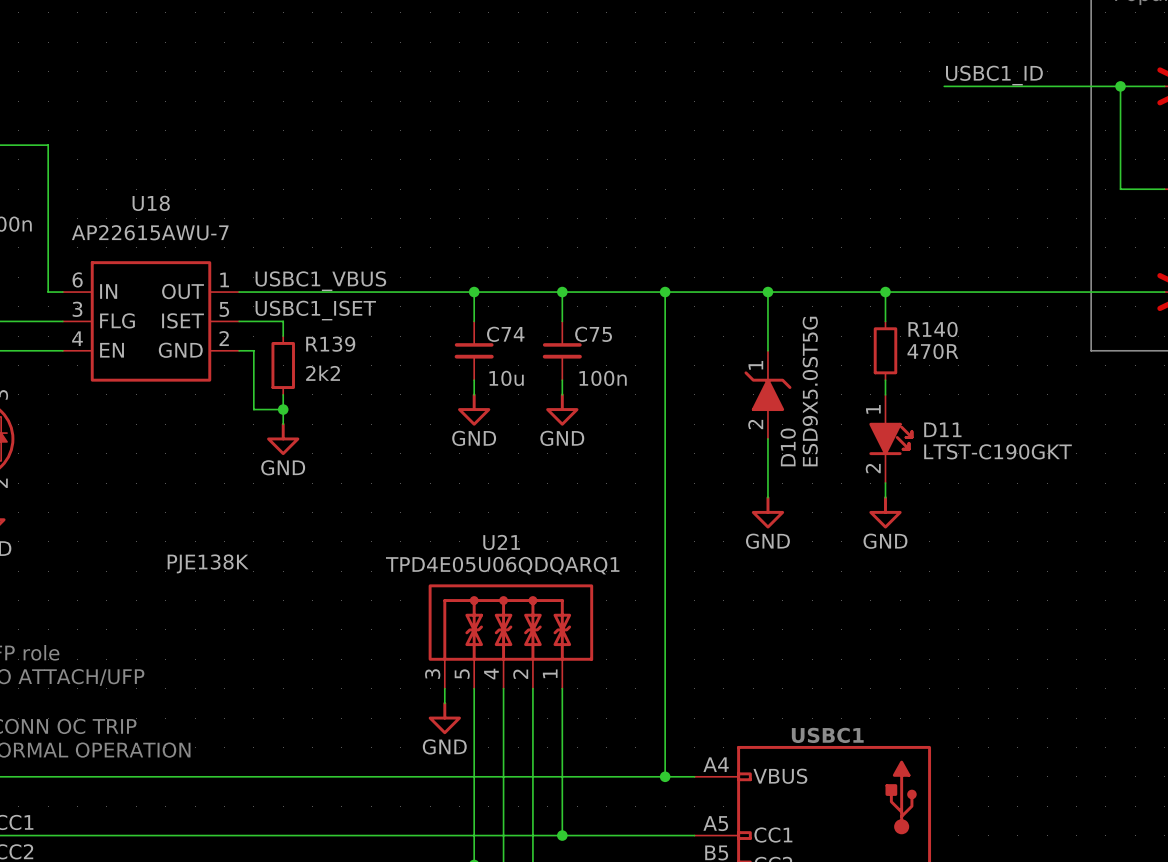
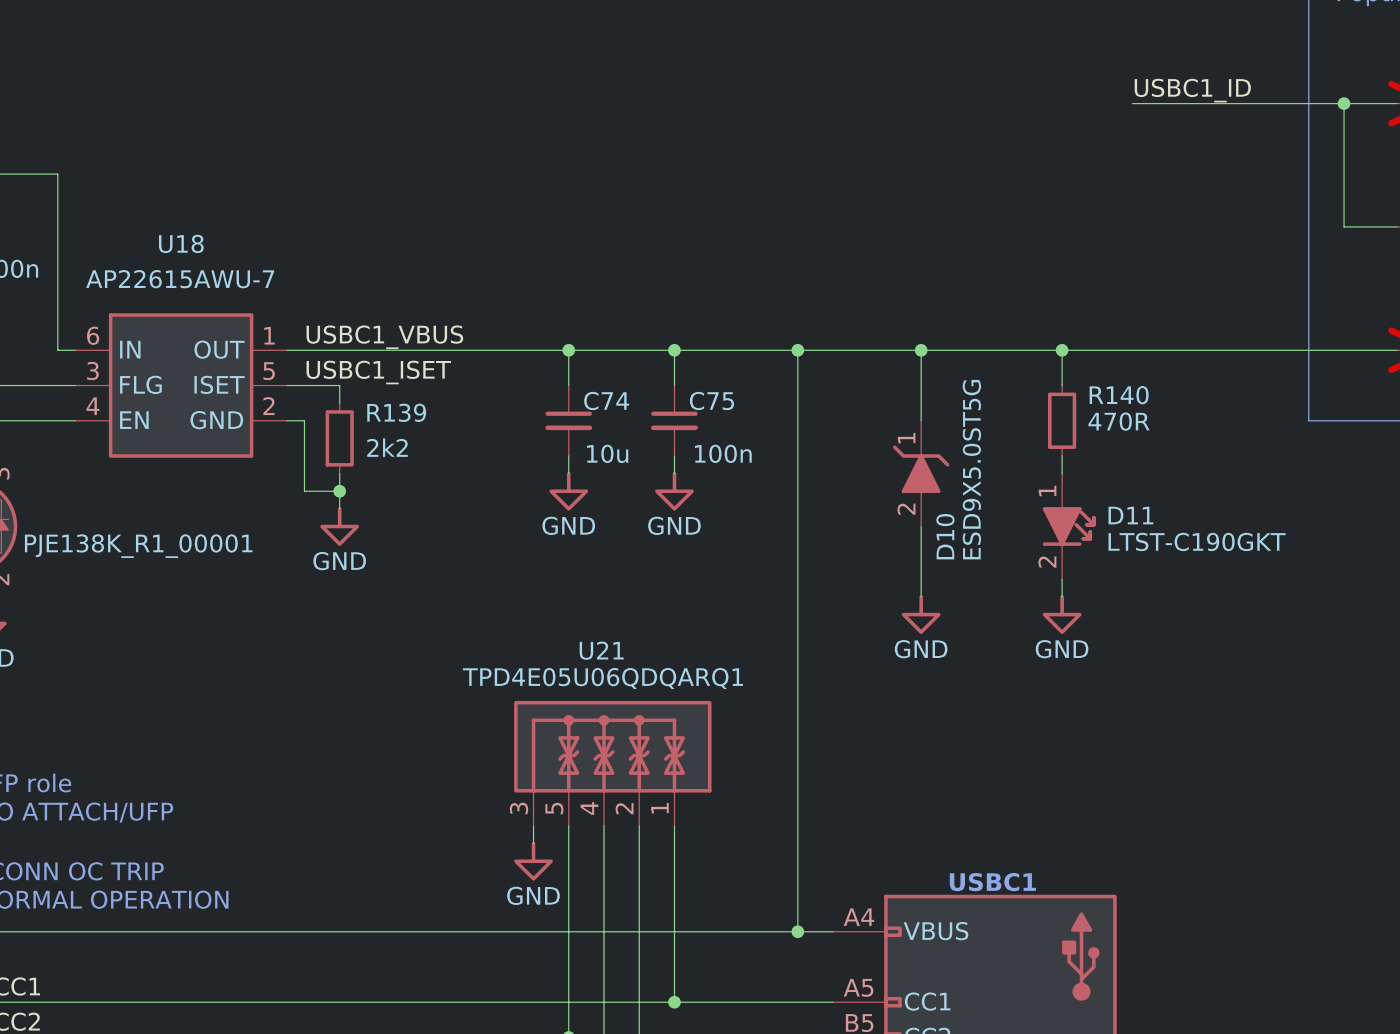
part text: none -> PJE138K_R1_00001 (138, 546)
part value: PJE138K (208, 563) -> none

